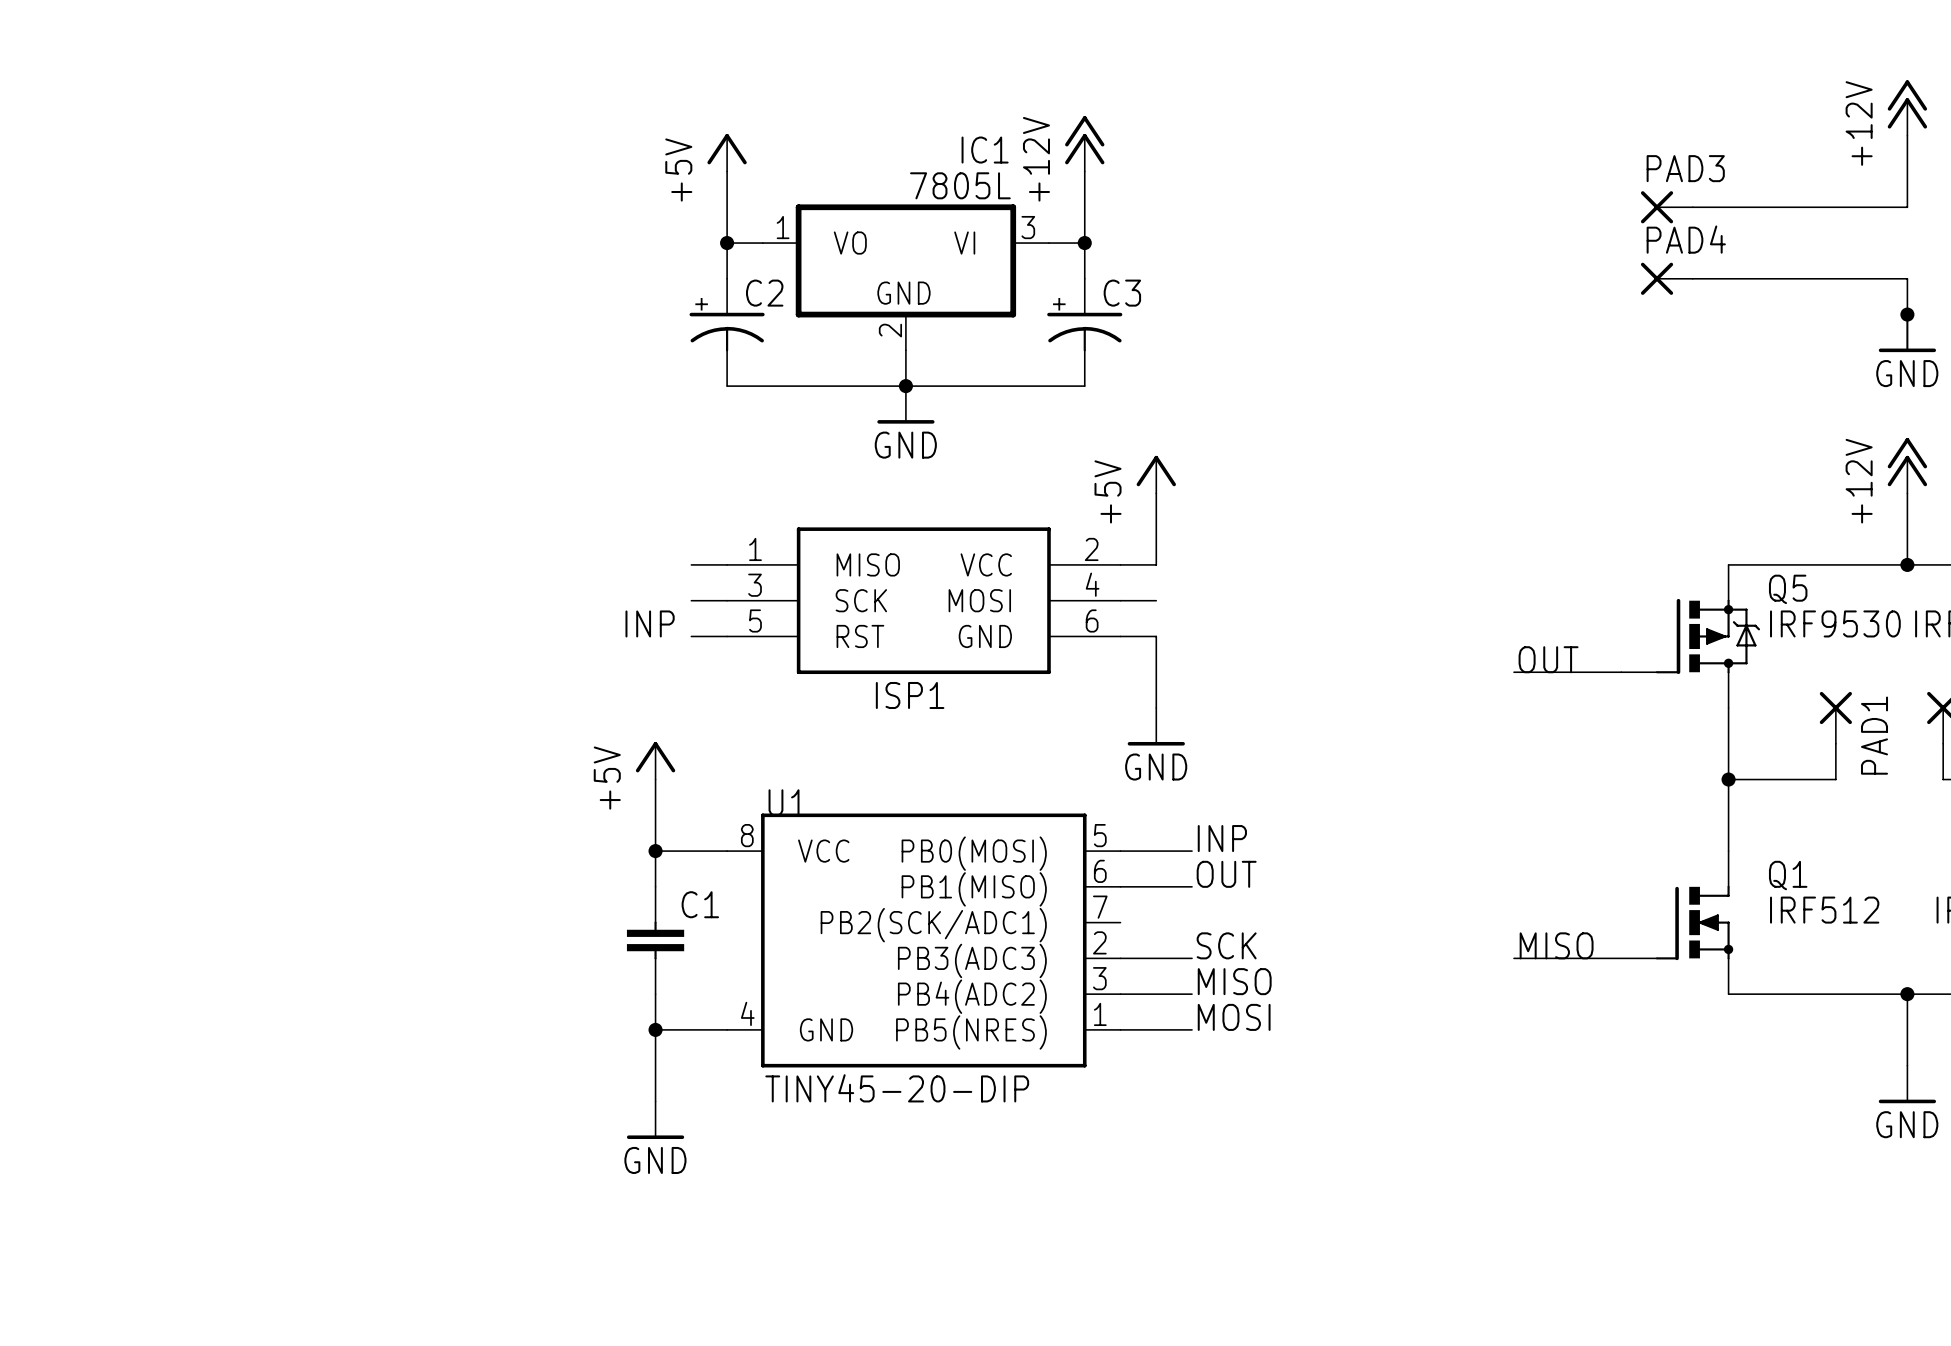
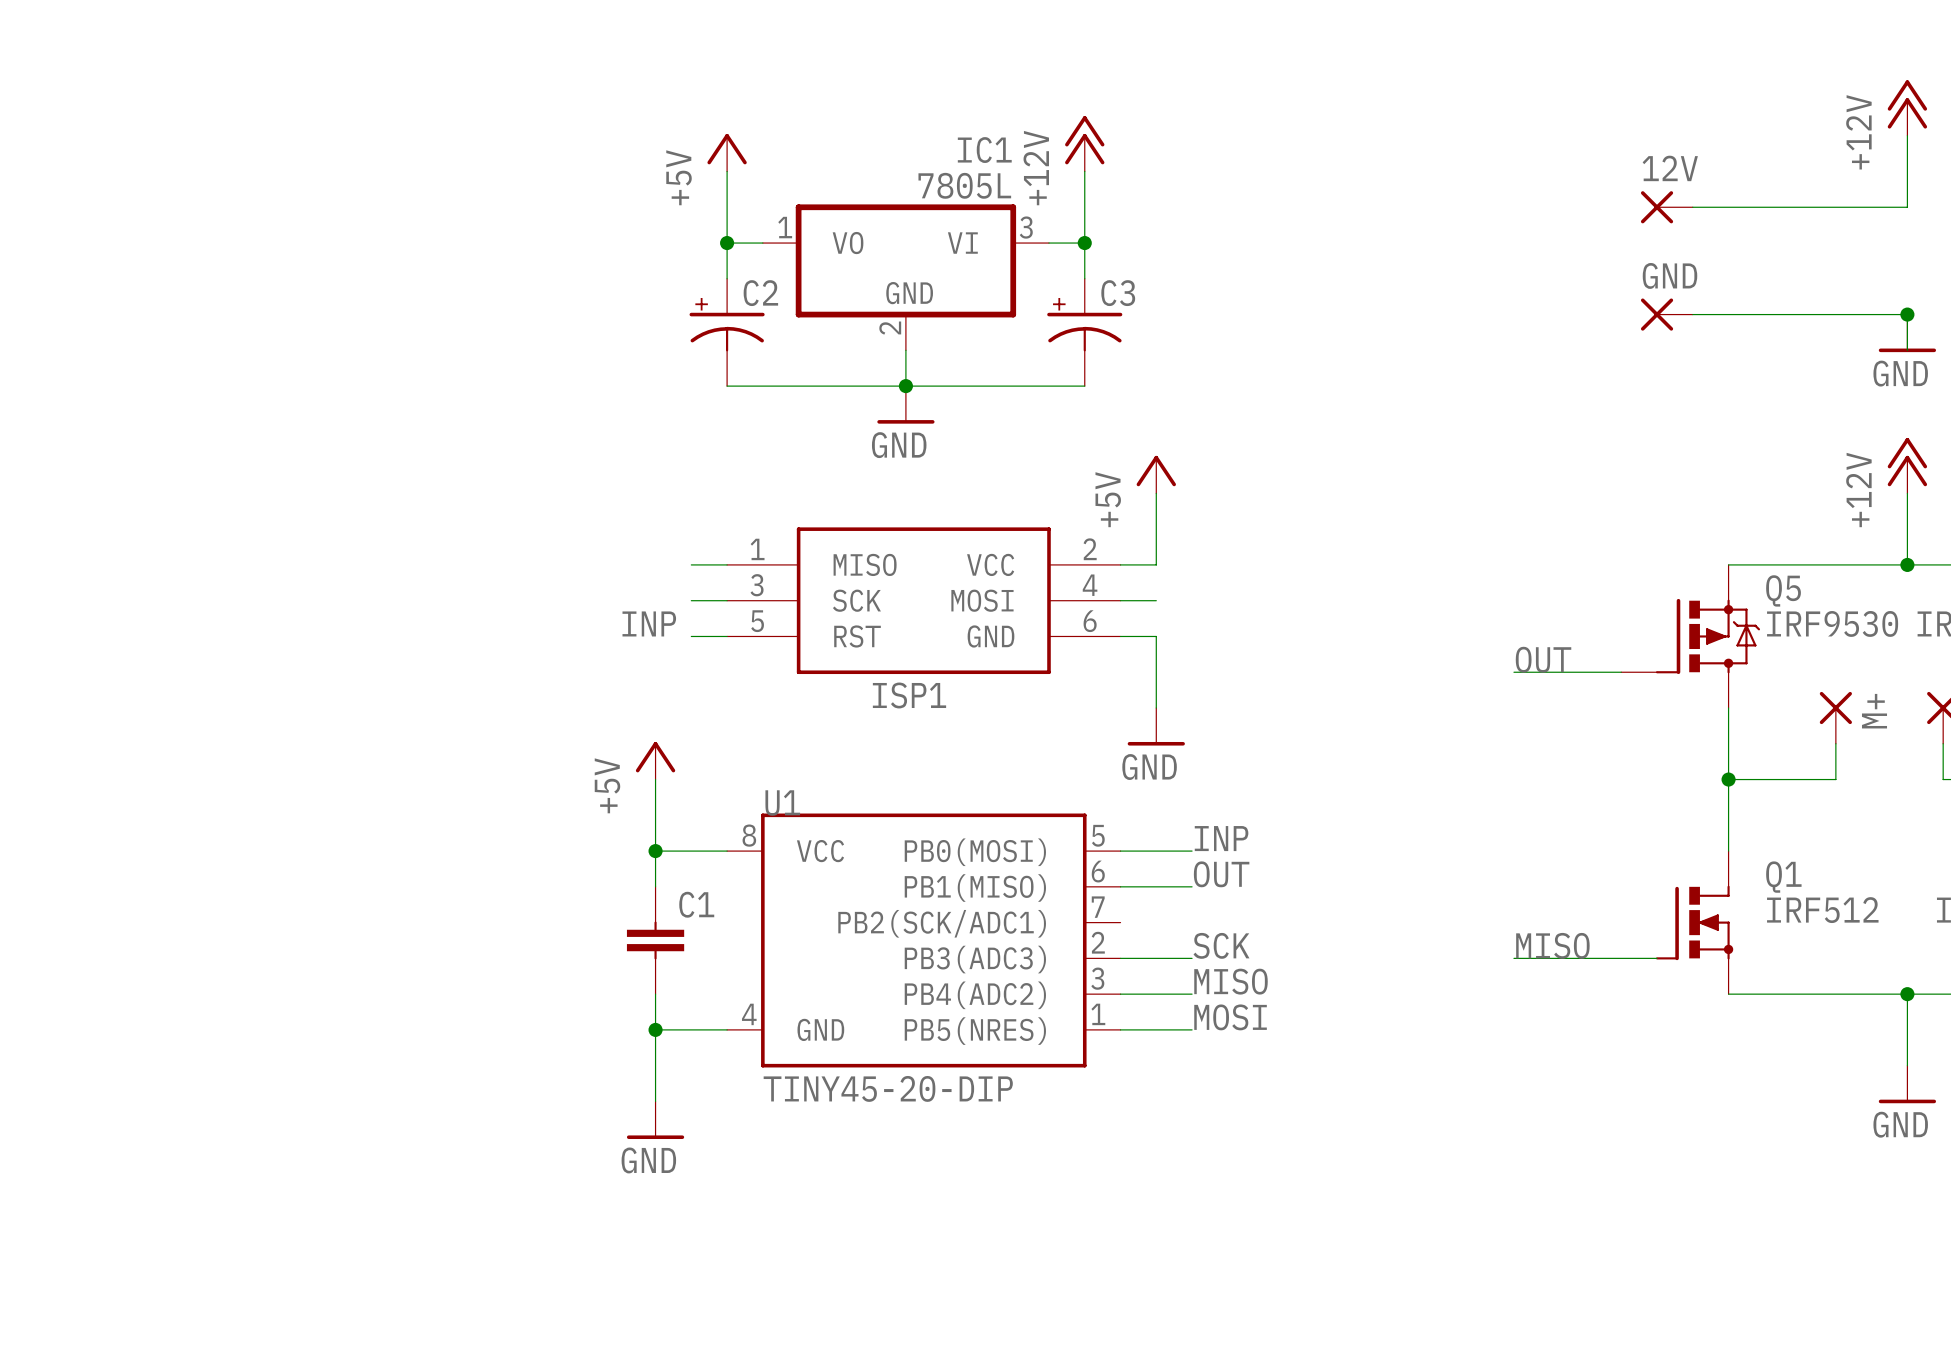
PAD3 name: PAD3 (1685, 168) -> 12V (1670, 168)
PAD4: (1666, 278) -> none
wire: (1692, 278) (1907, 278) (1907, 314) -> (1692, 314) (1907, 314)
GND: none -> (1666, 314)
PAD1 name: PAD1 (1874, 735) -> M+ (1874, 711)

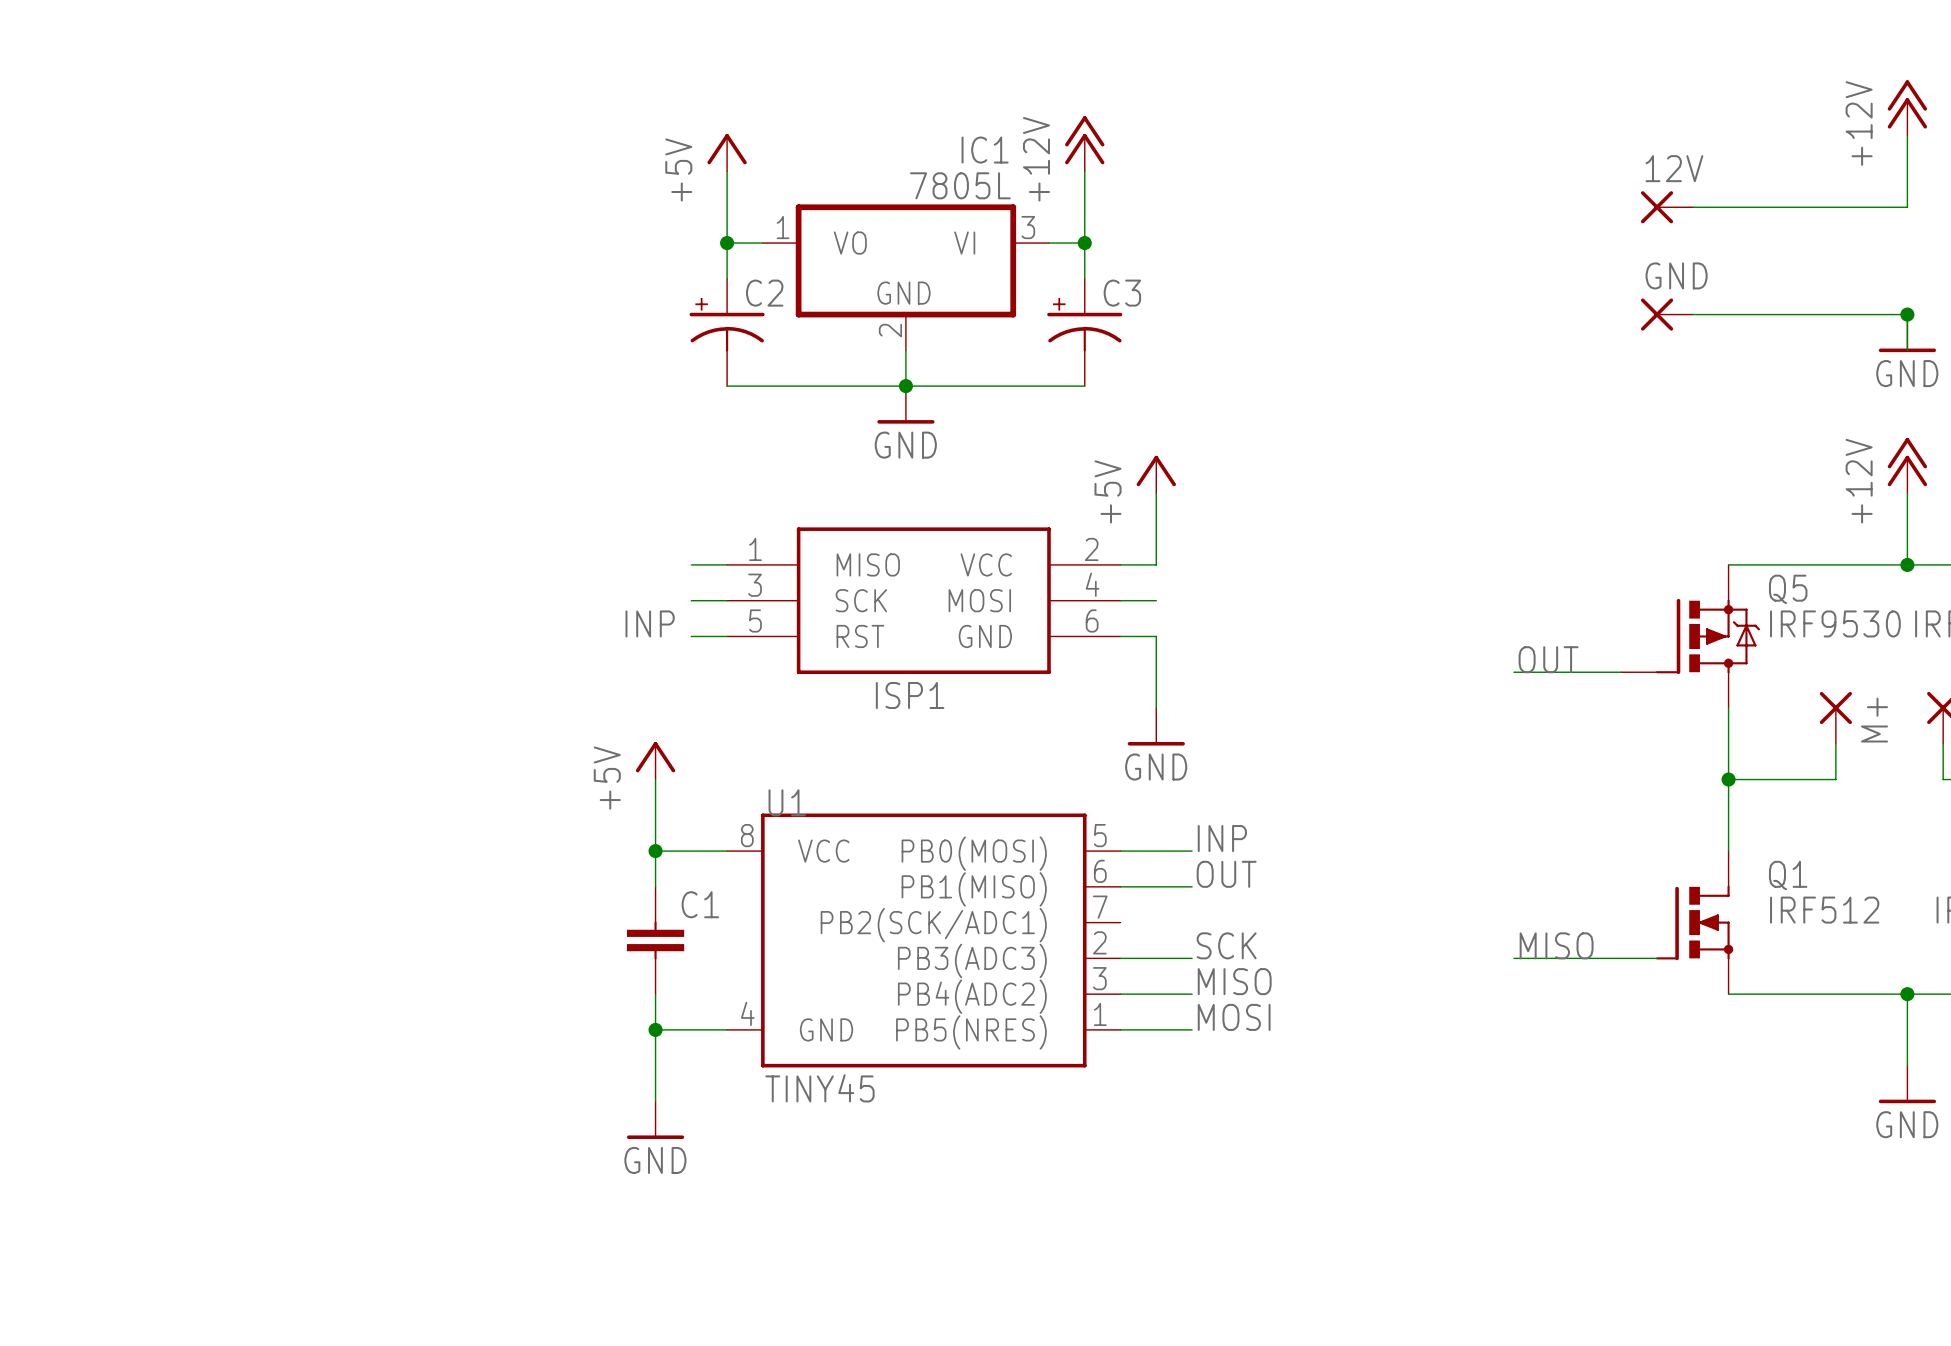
U1 value: TINY45-20-DIP (888, 1088) -> TINY45 (819, 1088)

